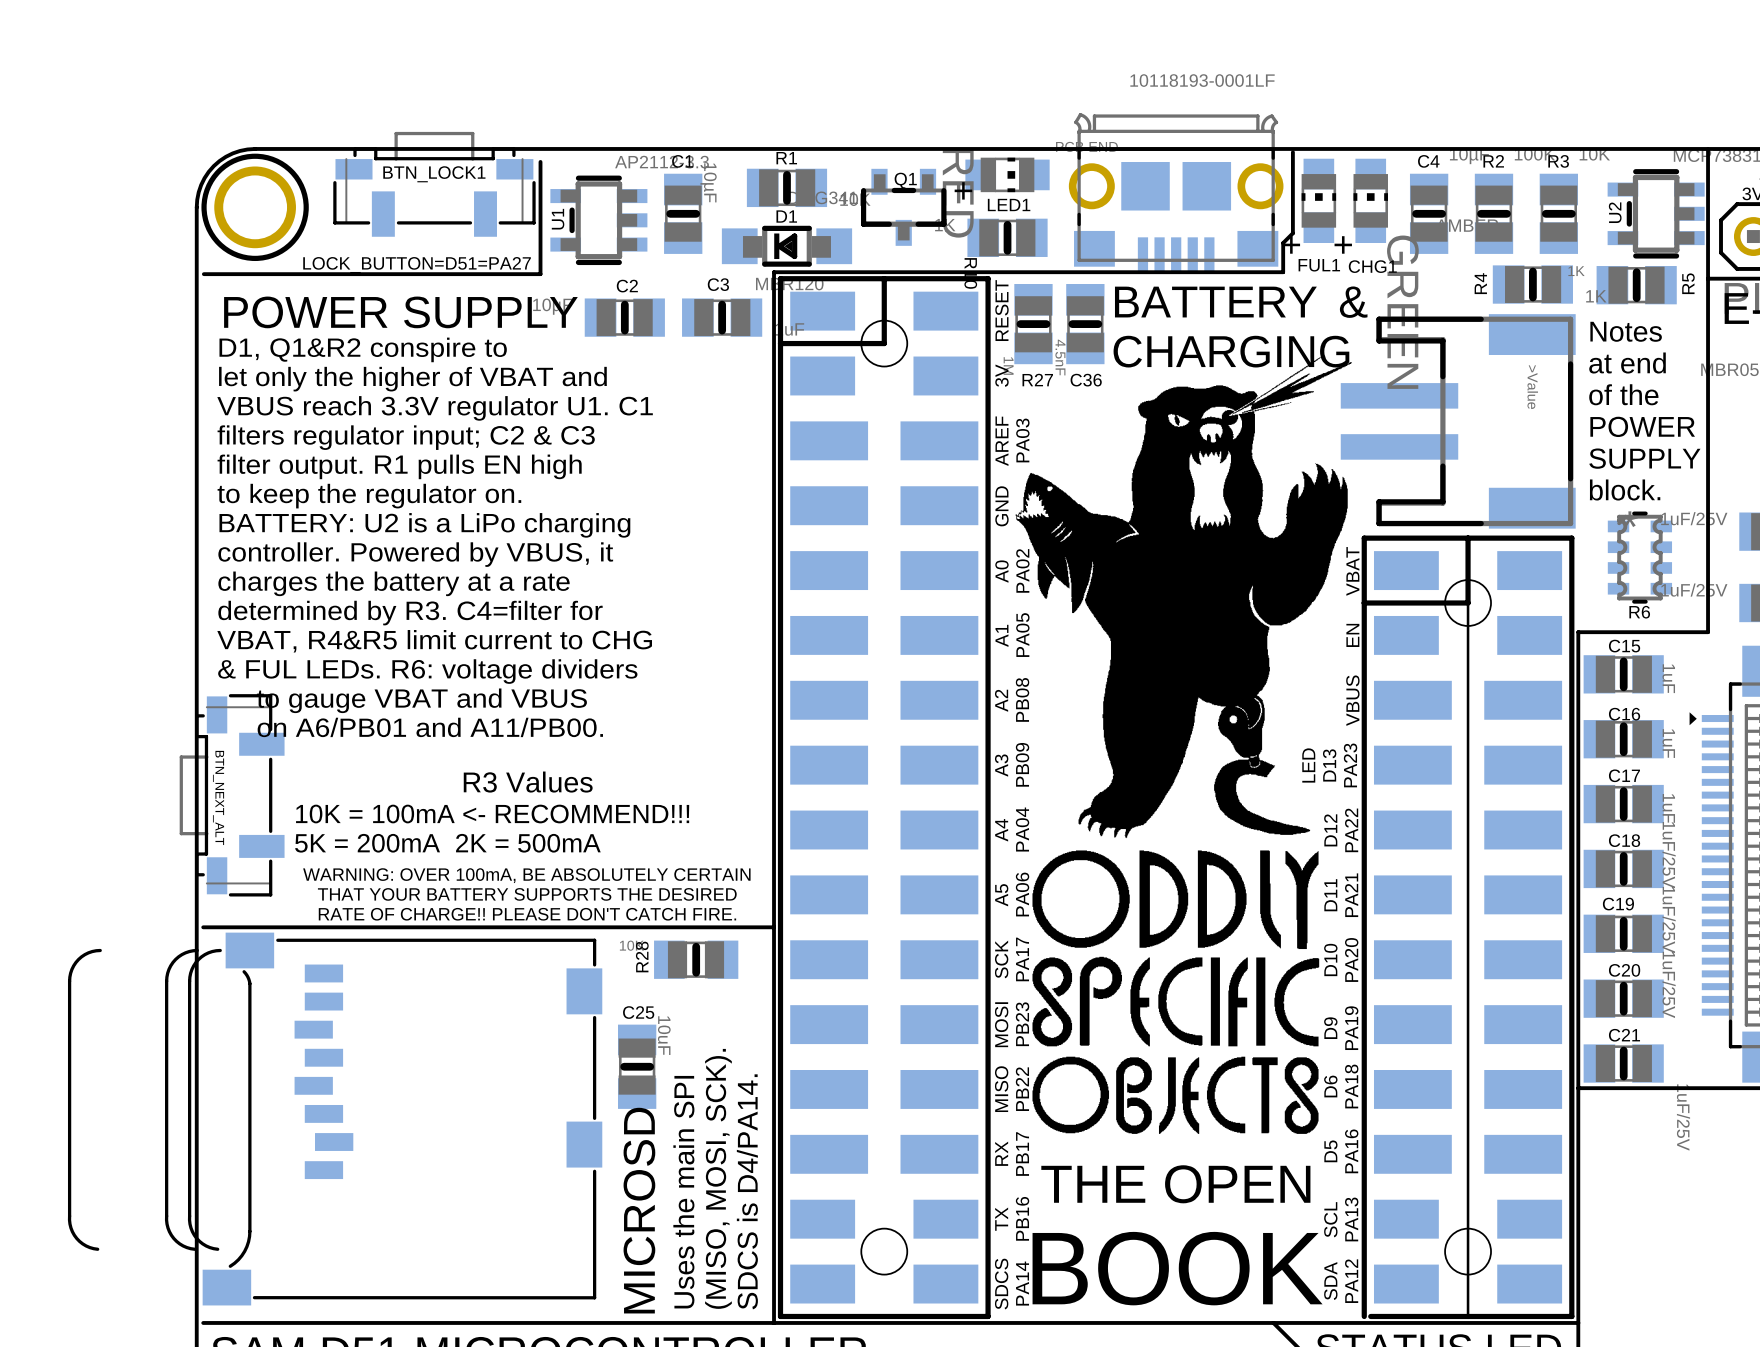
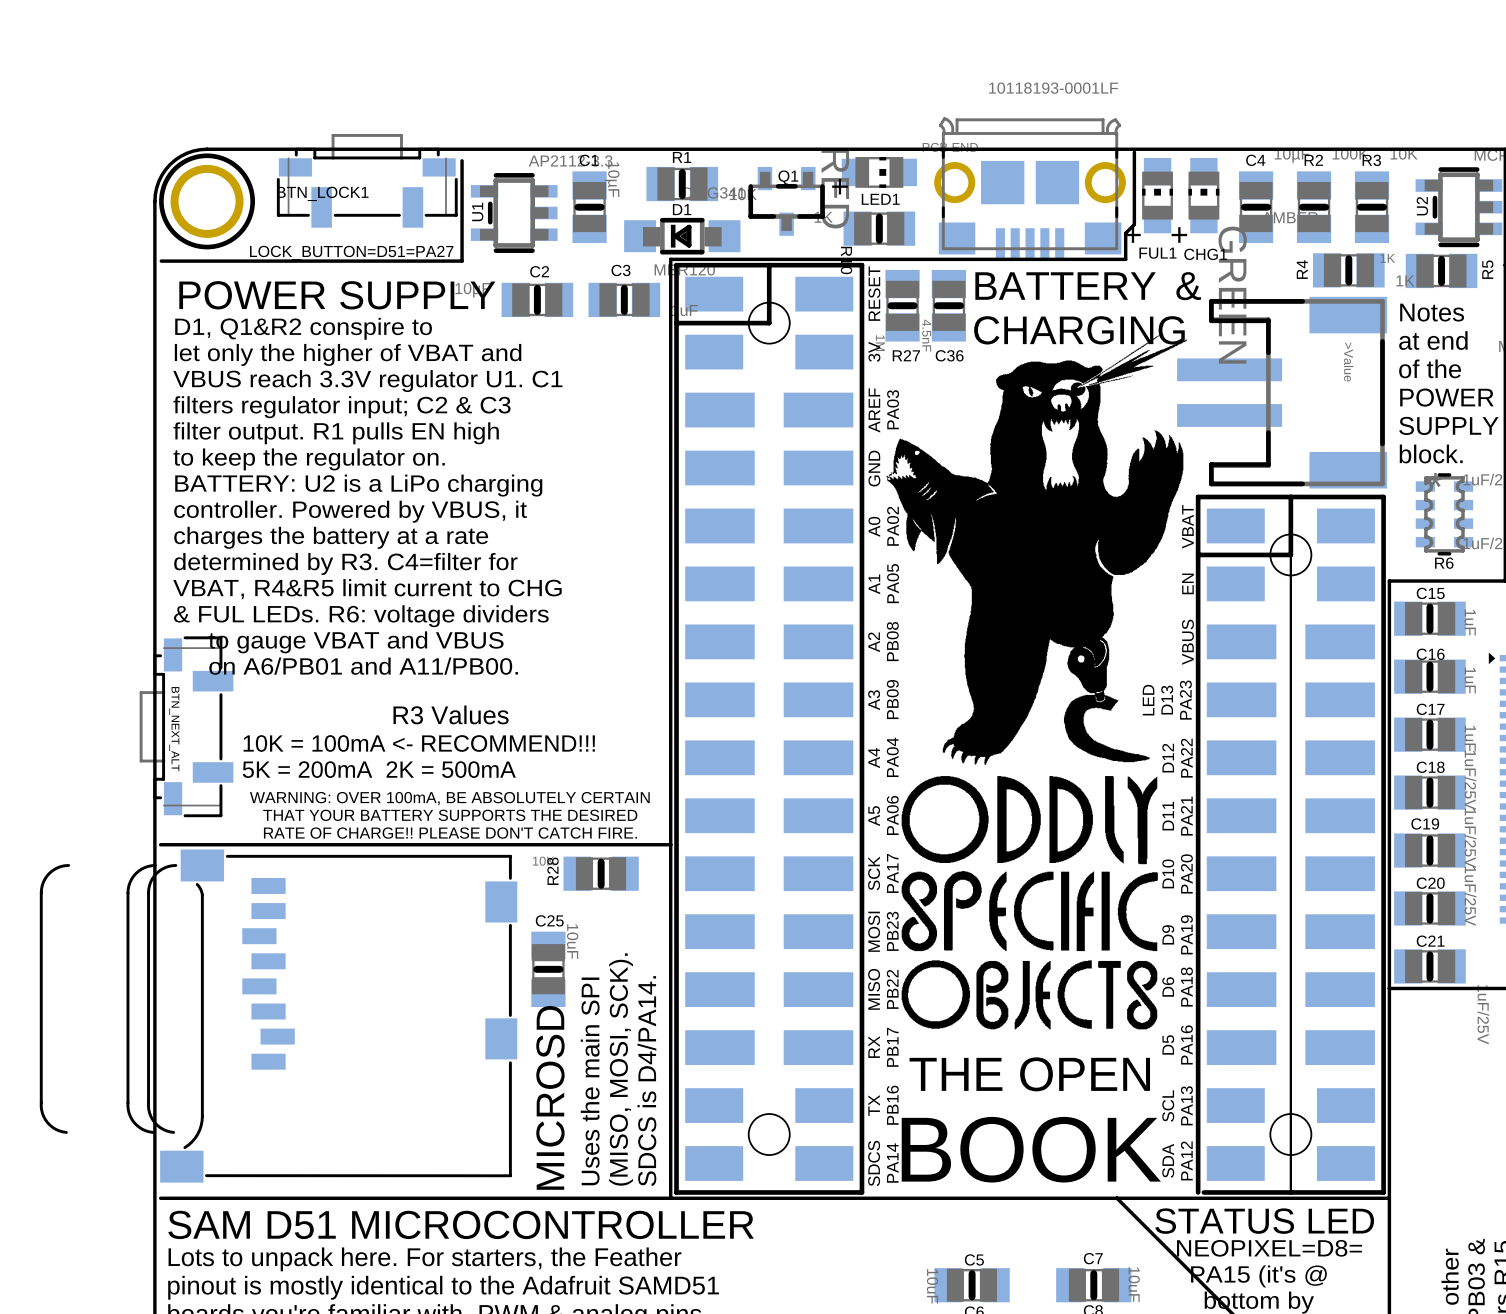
BTN_LOCK1 name position: BTN_LOCK1 (434, 174) -> BTN_LOCK1 (322, 193)

